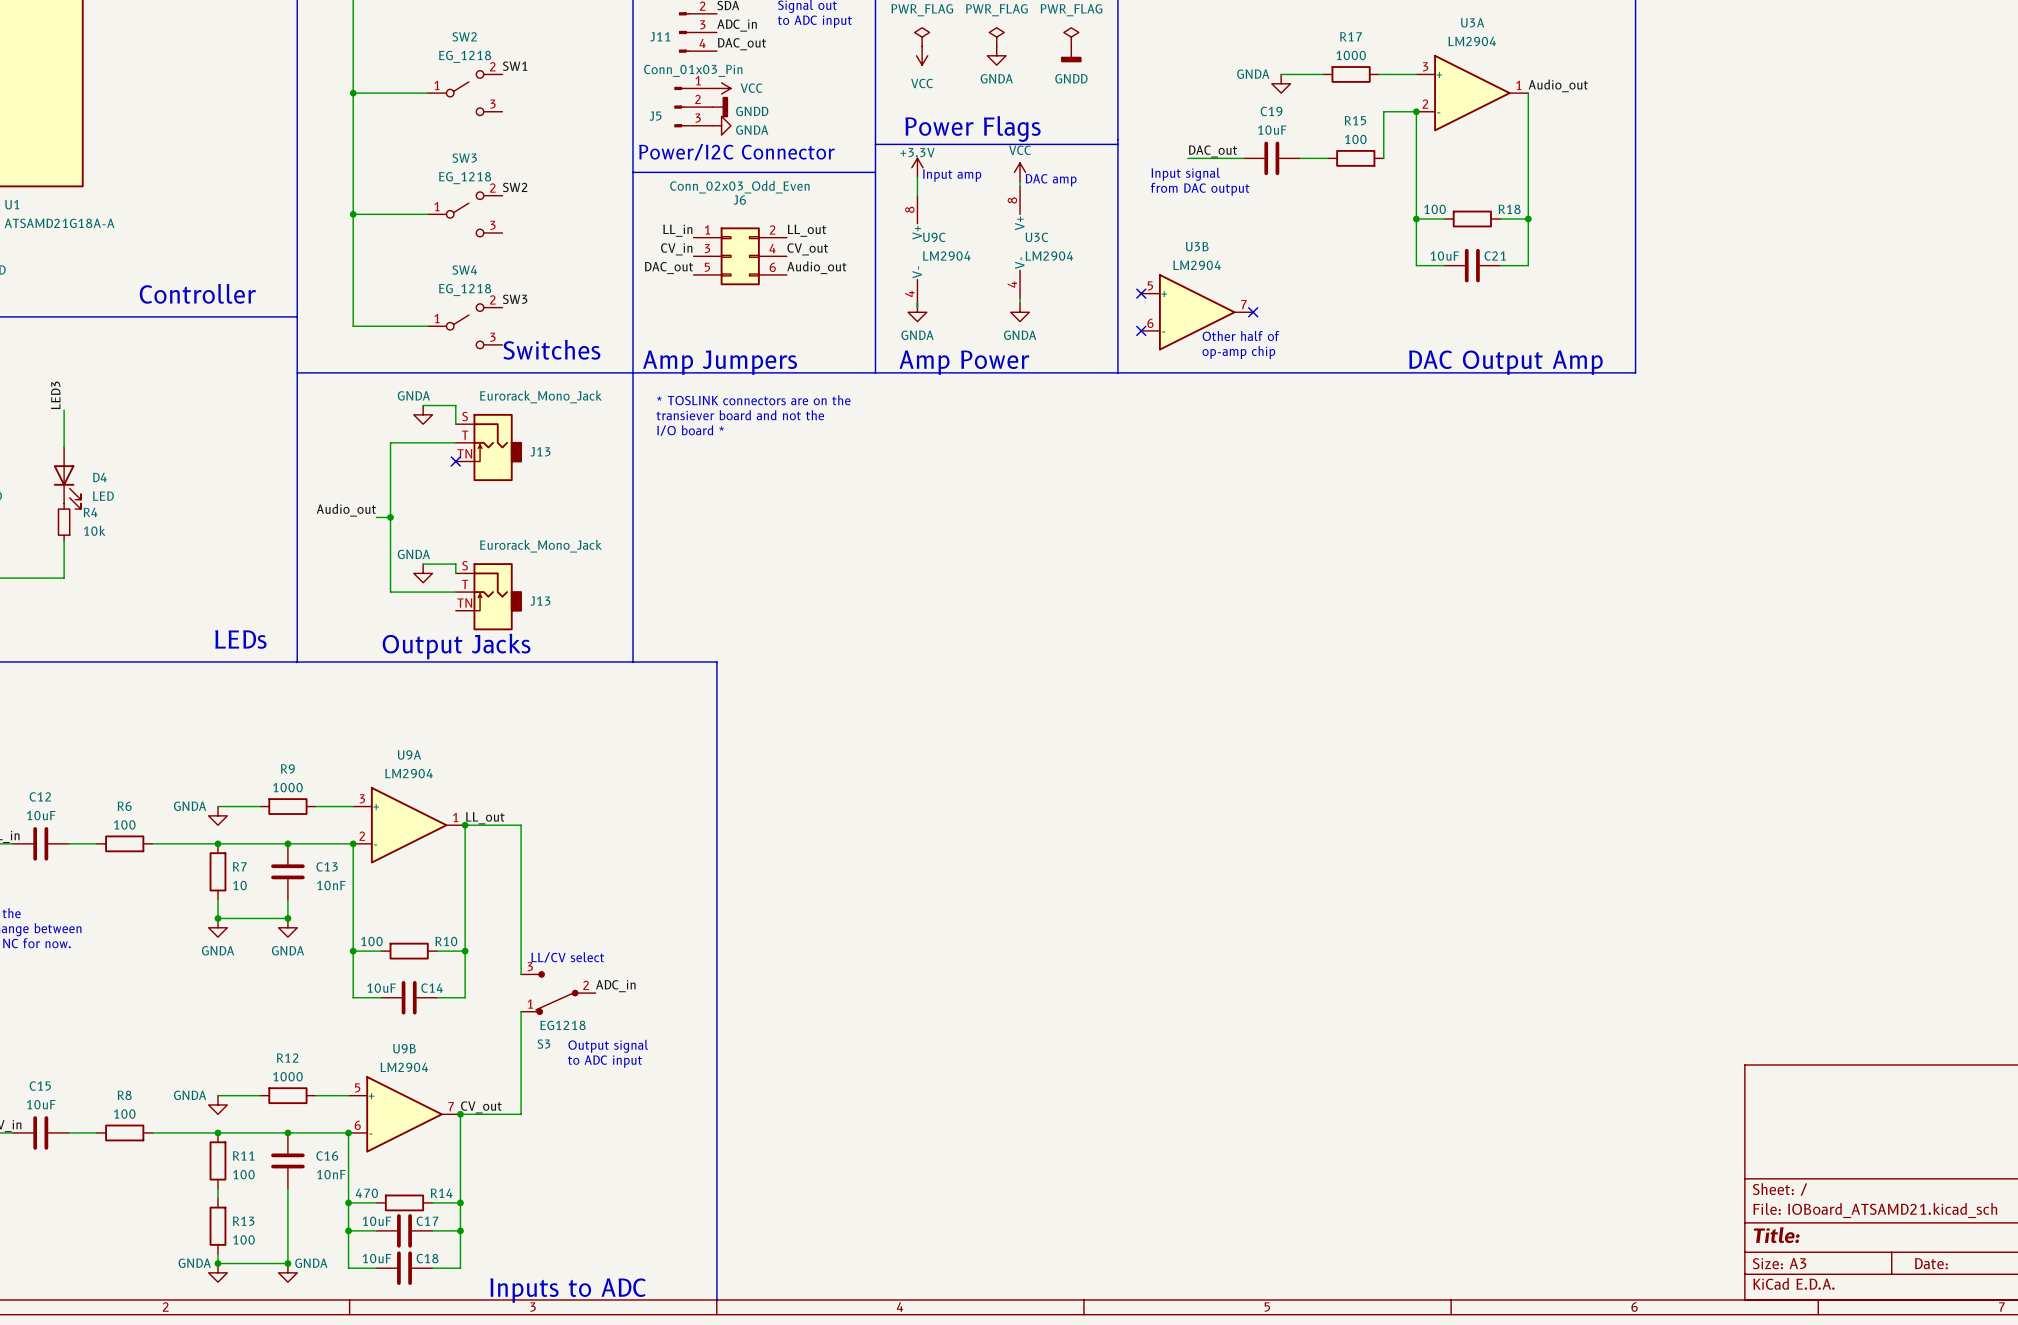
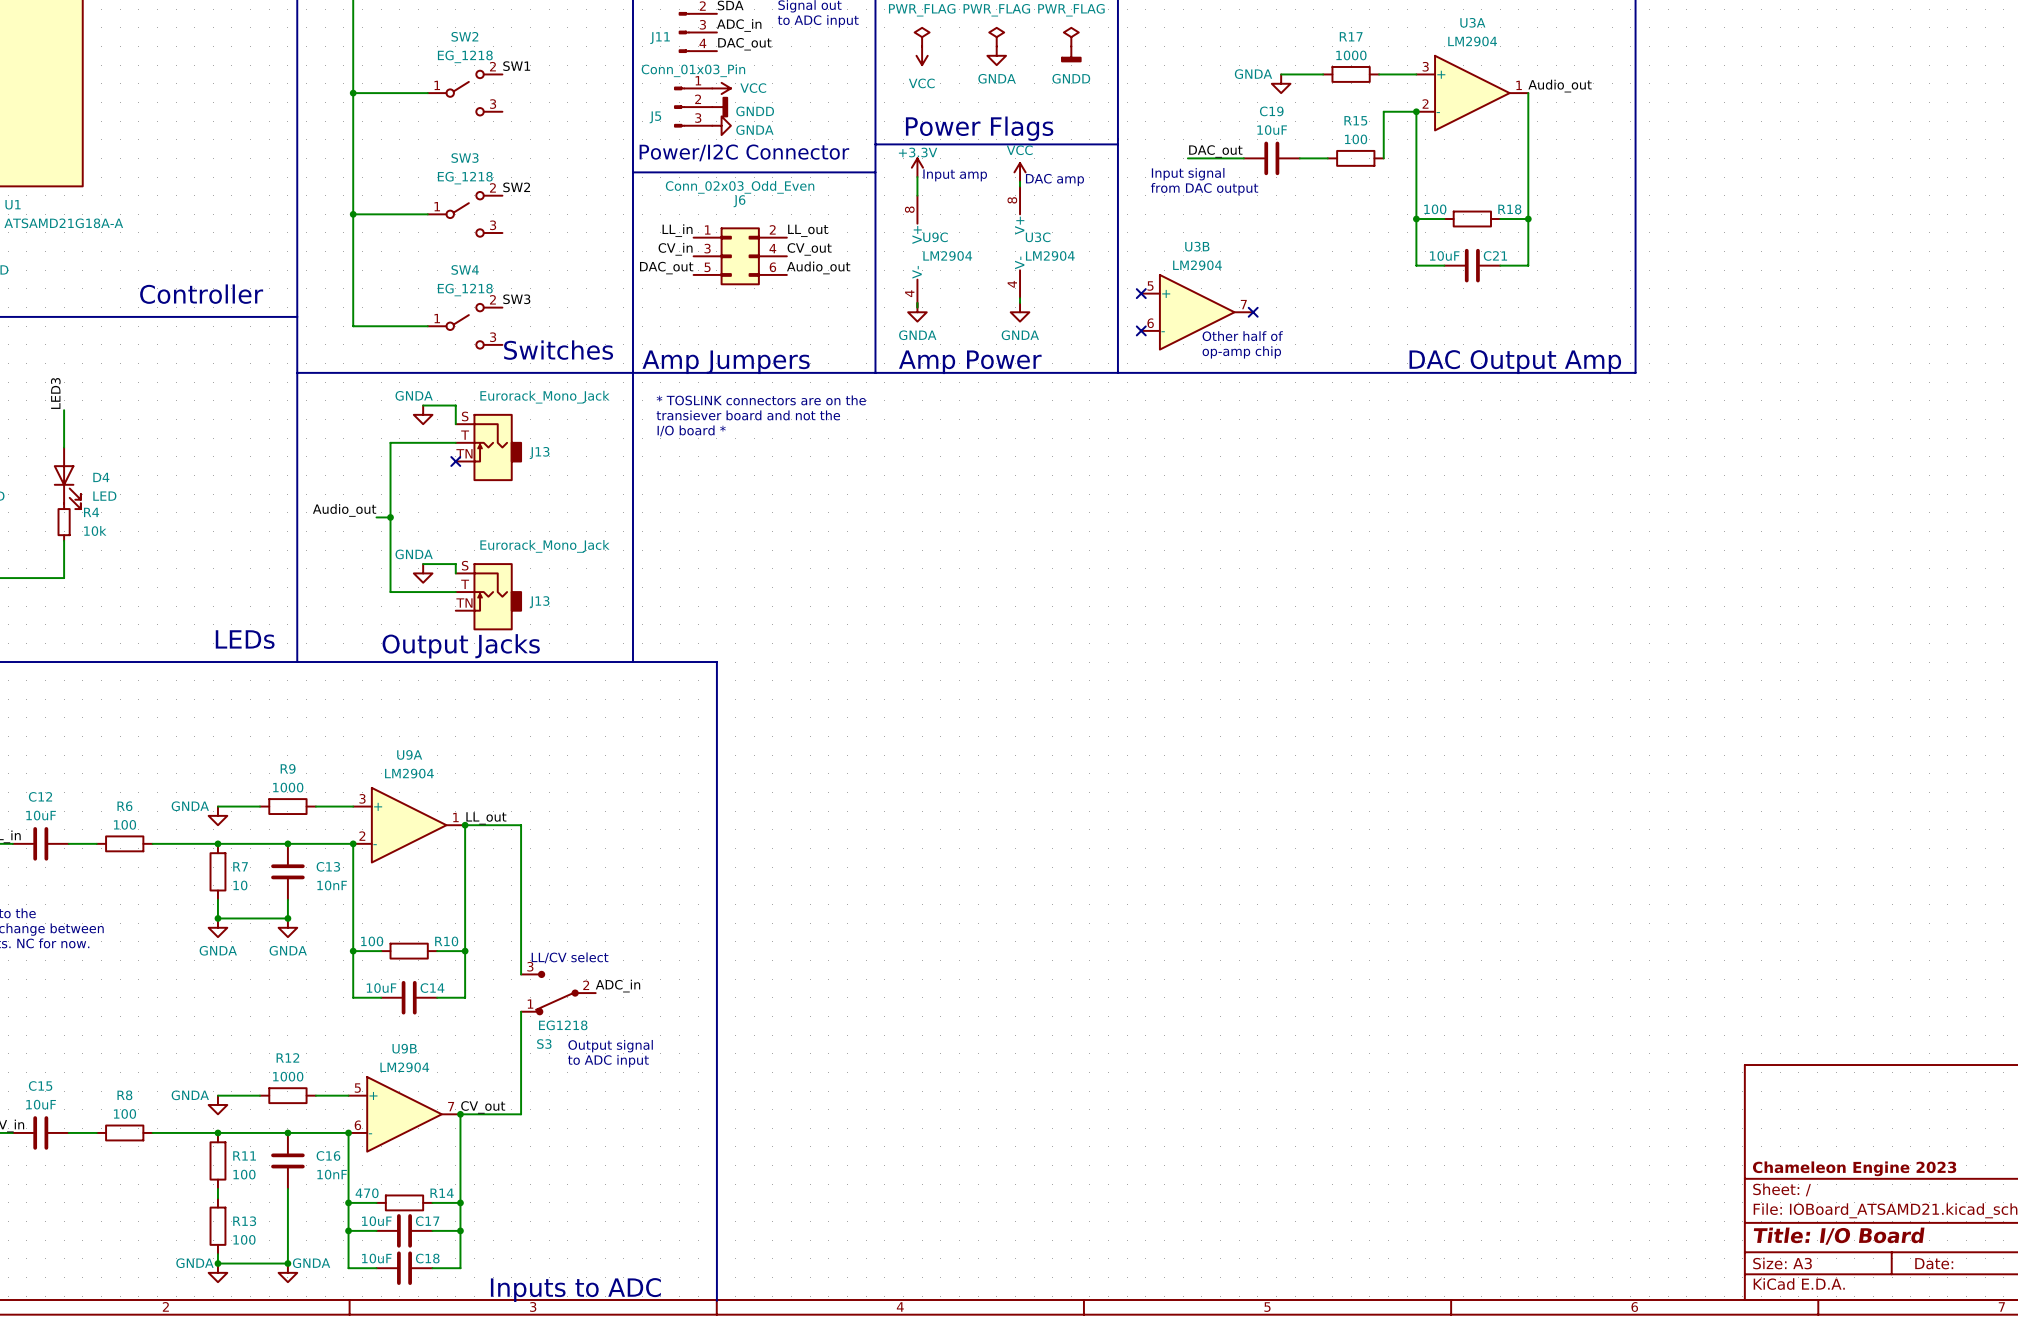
title block: none -> Chameleon Engine 2023 (1854, 1168)
title block: Title: (1776, 1235) -> Title: I/O Board (1839, 1236)

